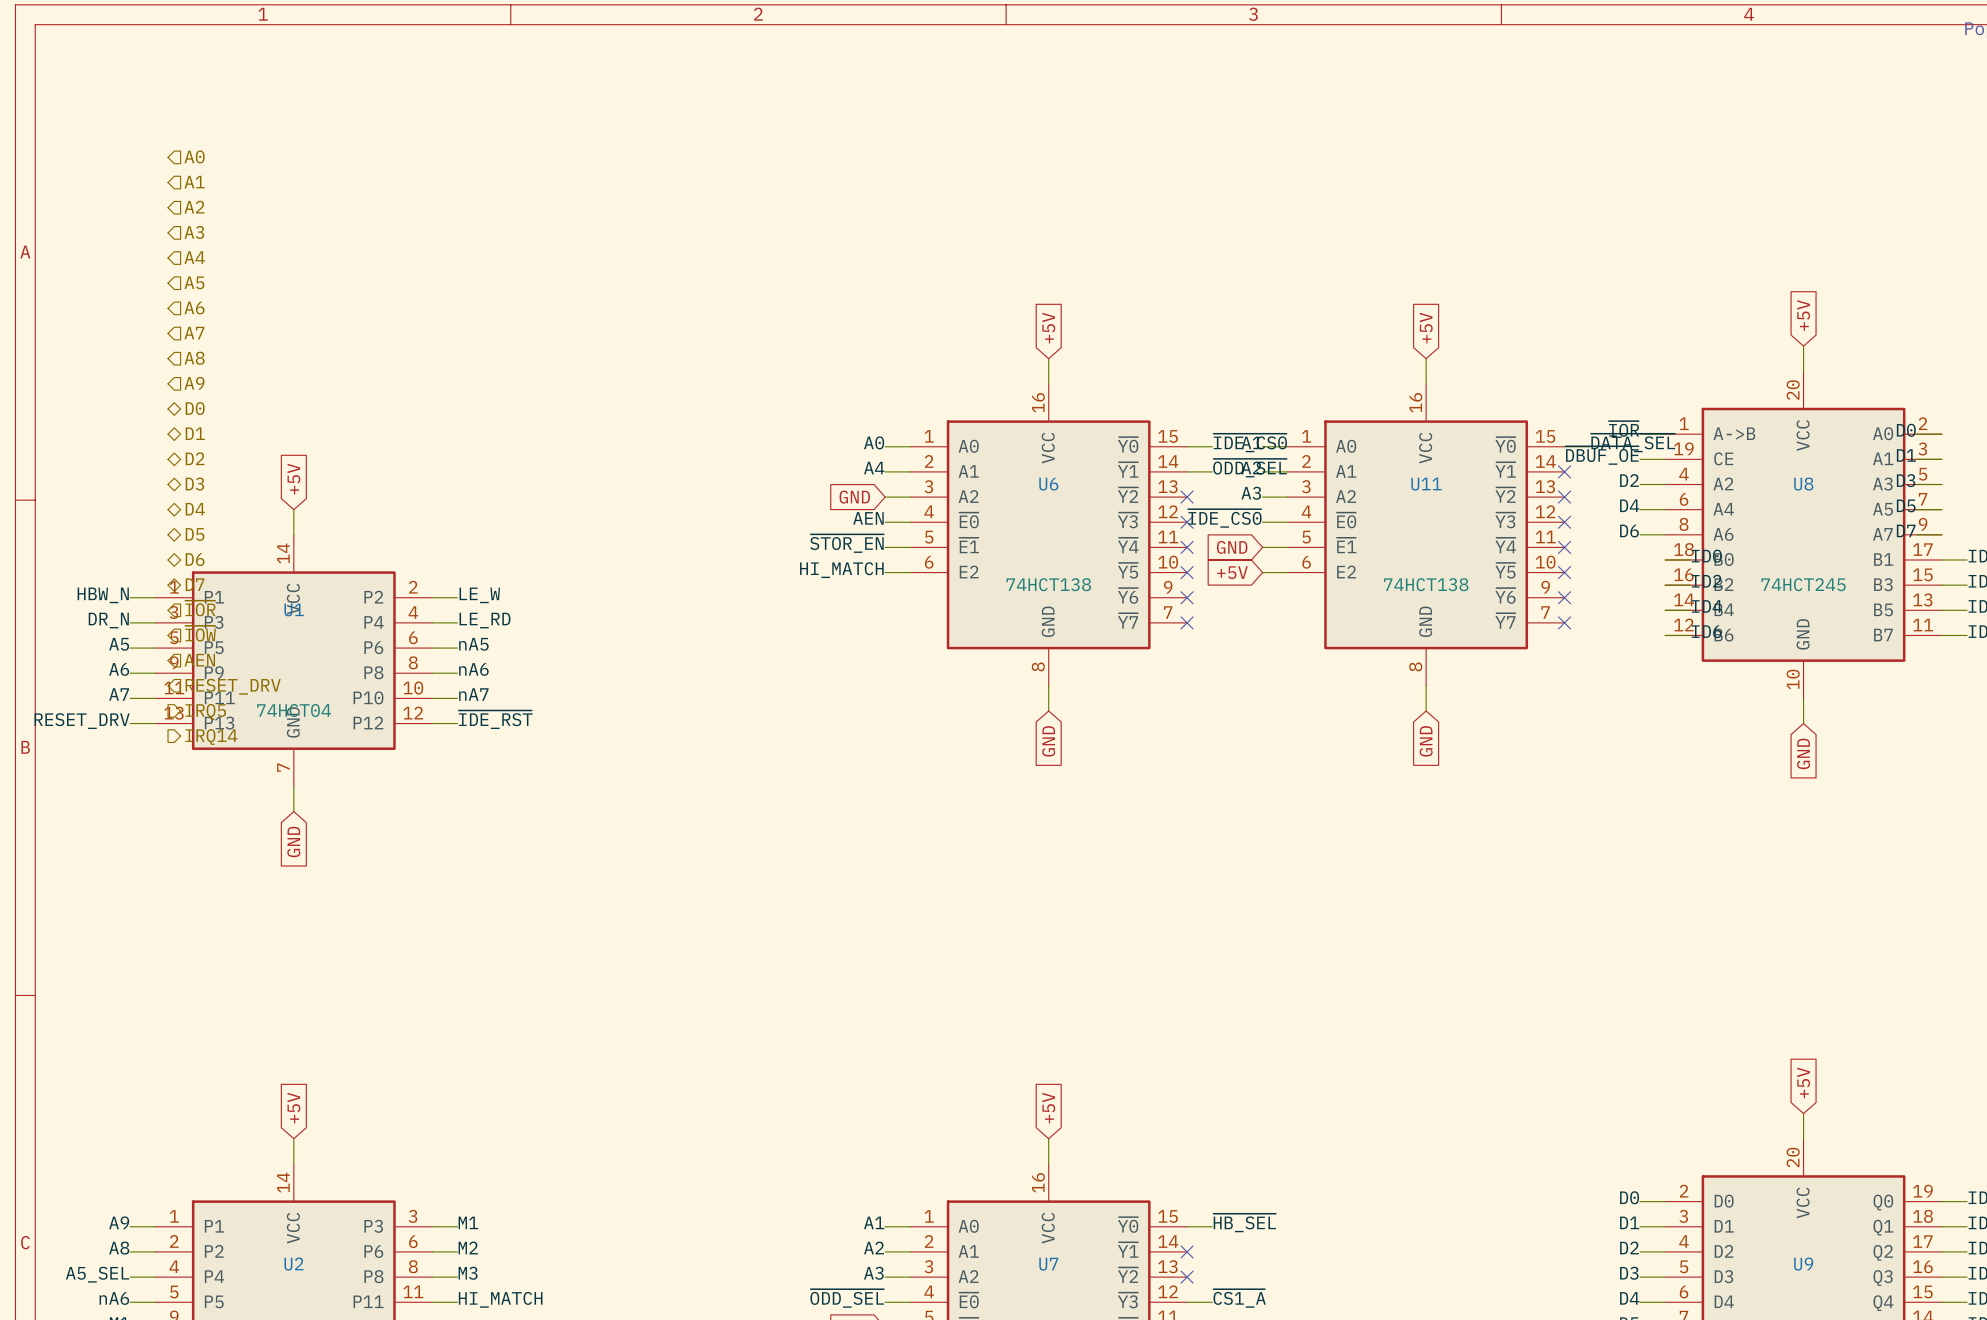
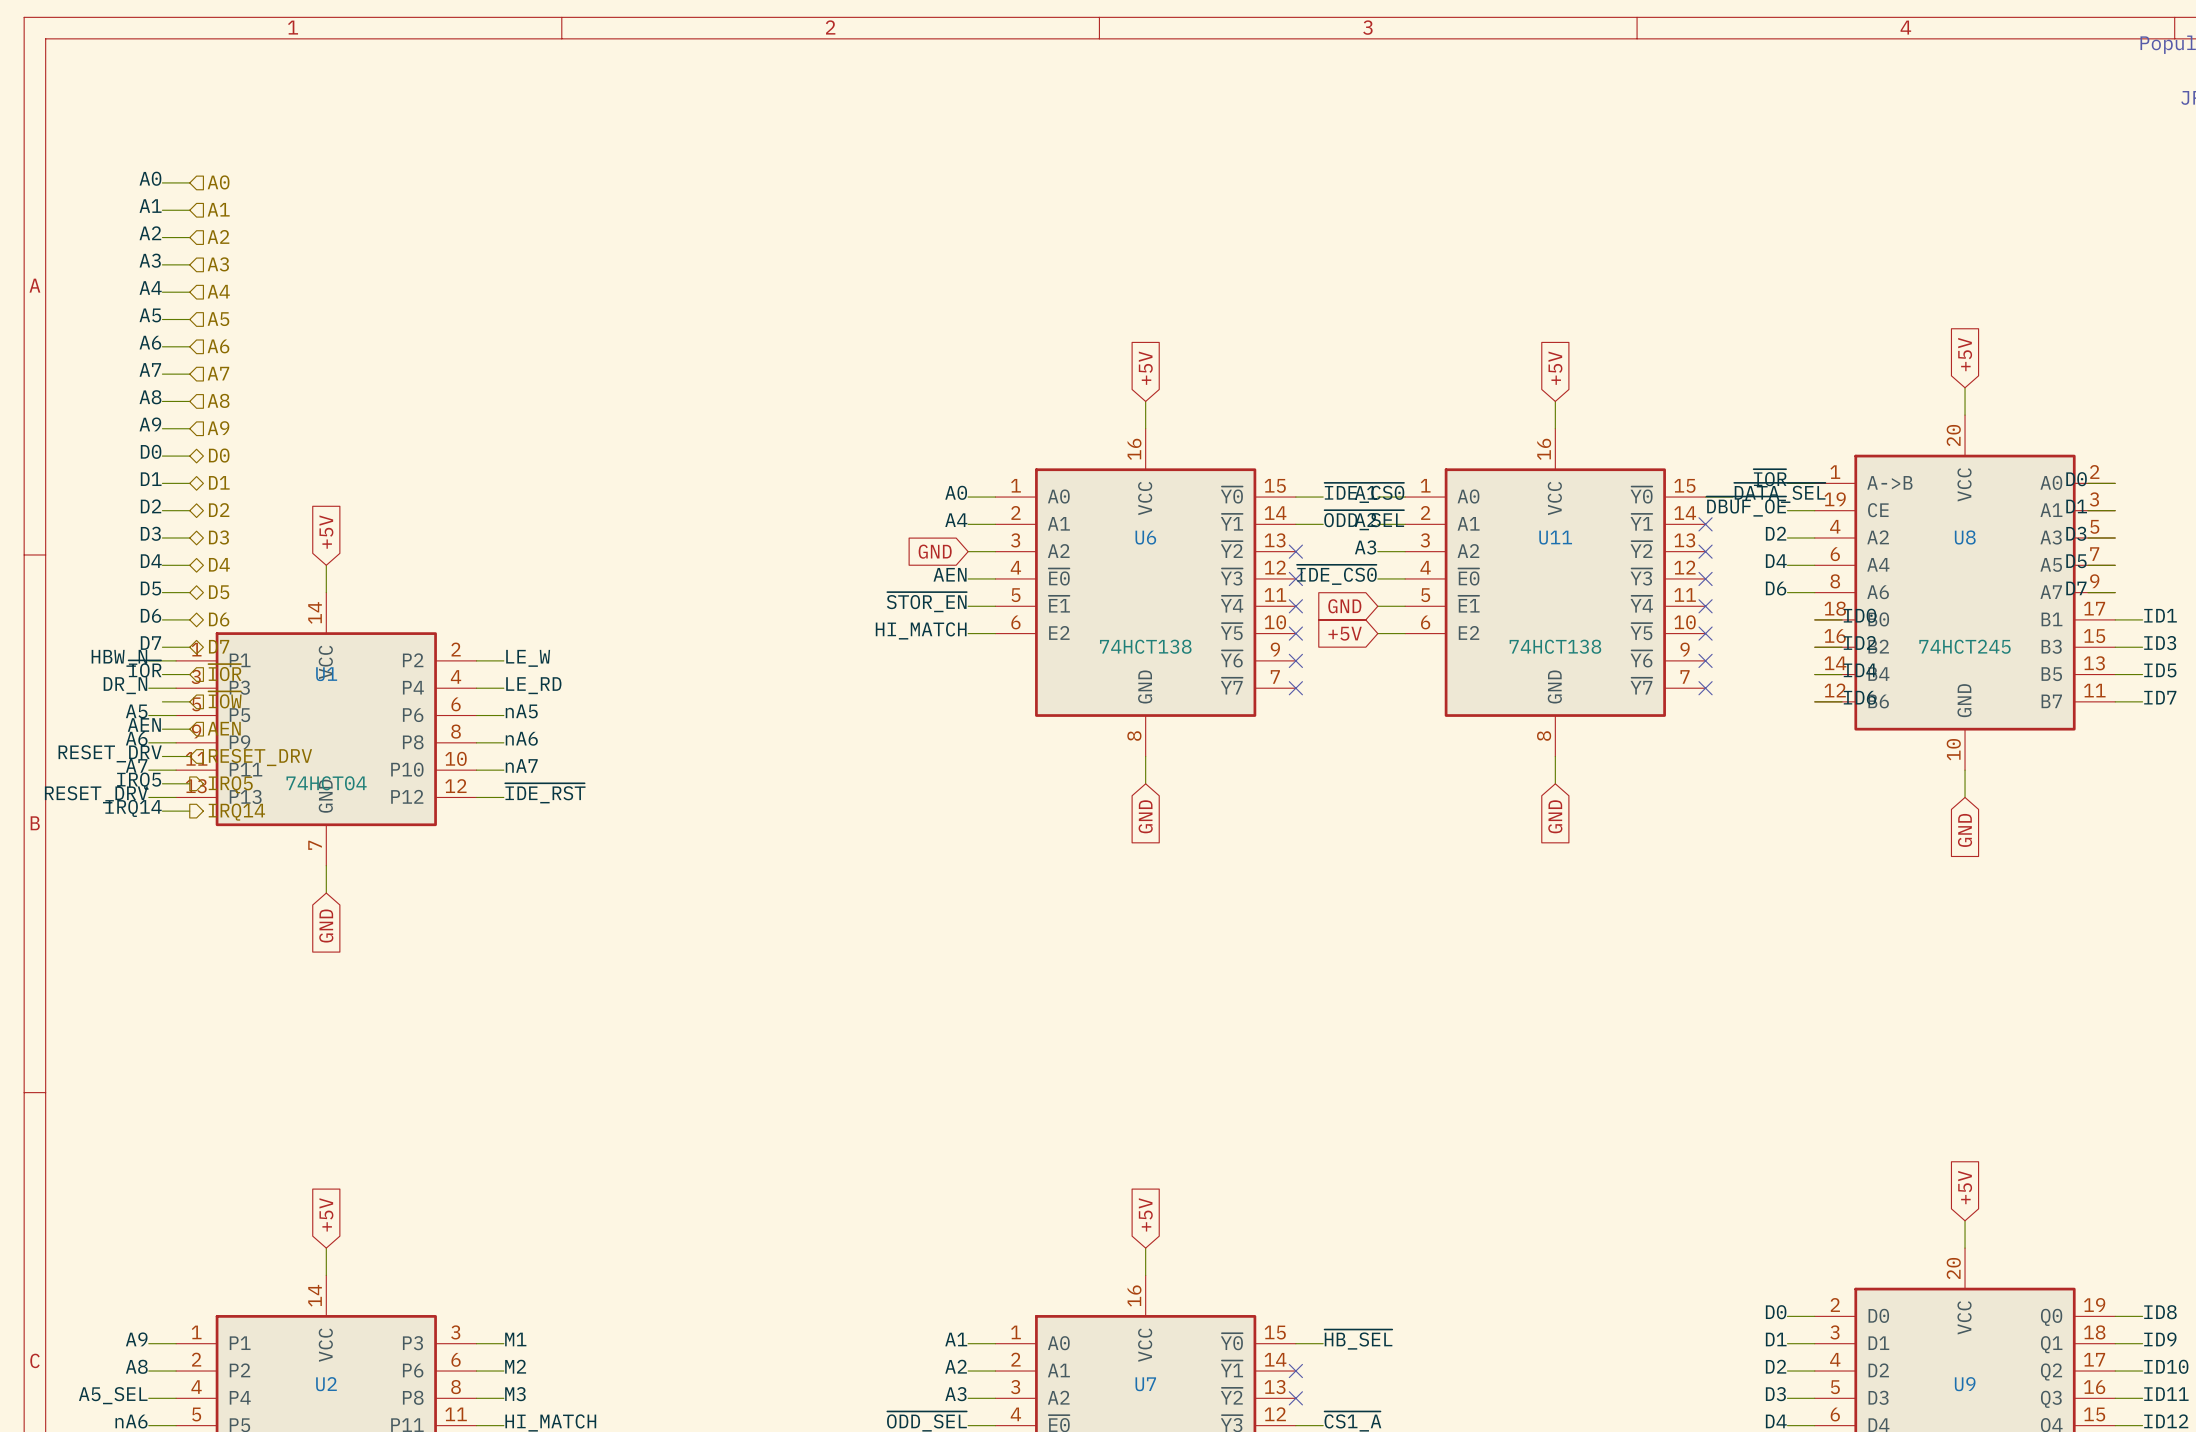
label: none -> A0 (150, 178)
wire: none -> (162, 182) (189, 182)
label: none -> A1 (150, 206)
wire: none -> (162, 210) (189, 210)
label: none -> A2 (150, 233)
wire: none -> (162, 237) (189, 237)
label: none -> A3 (150, 260)
wire: none -> (162, 264) (189, 264)
label: none -> A4 (150, 287)
wire: none -> (162, 292) (189, 292)
label: none -> A5 (150, 315)
wire: none -> (162, 319) (189, 319)
label: none -> A6 (150, 342)
wire: none -> (162, 346) (189, 346)
label: none -> A7 (150, 369)
wire: none -> (162, 374) (189, 374)
label: none -> A8 (150, 397)
wire: none -> (162, 401) (189, 401)
label: none -> A9 (150, 424)
wire: none -> (162, 428) (189, 428)
label: none -> D0 (151, 451)
wire: none -> (162, 456) (189, 456)
label: none -> D1 (151, 479)
wire: none -> (162, 483) (189, 483)
label: none -> D2 (151, 506)
wire: none -> (162, 510) (189, 510)
label: none -> D3 (150, 533)
wire: none -> (162, 538) (189, 538)
label: none -> D4 (151, 561)
wire: none -> (162, 565) (189, 565)
label: none -> D5 (150, 588)
wire: none -> (162, 592) (189, 592)
label: none -> D6 (151, 615)
wire: none -> (162, 619) (189, 619)
label: none -> D7 (150, 643)
wire: none -> (162, 647) (189, 647)
label: none -> ~{IOR} (145, 668)
wire: none -> (162, 674) (189, 674)
wire: none -> (162, 701) (189, 701)
label: none -> AEN (144, 724)
wire: none -> (162, 729) (189, 729)
label: none -> RESET_DRV (110, 753)
wire: none -> (162, 756) (189, 756)
label: none -> IRQ5 (139, 781)
wire: none -> (162, 783) (189, 783)
label: none -> IRQ14 (133, 808)
wire: none -> (162, 811) (189, 811)

